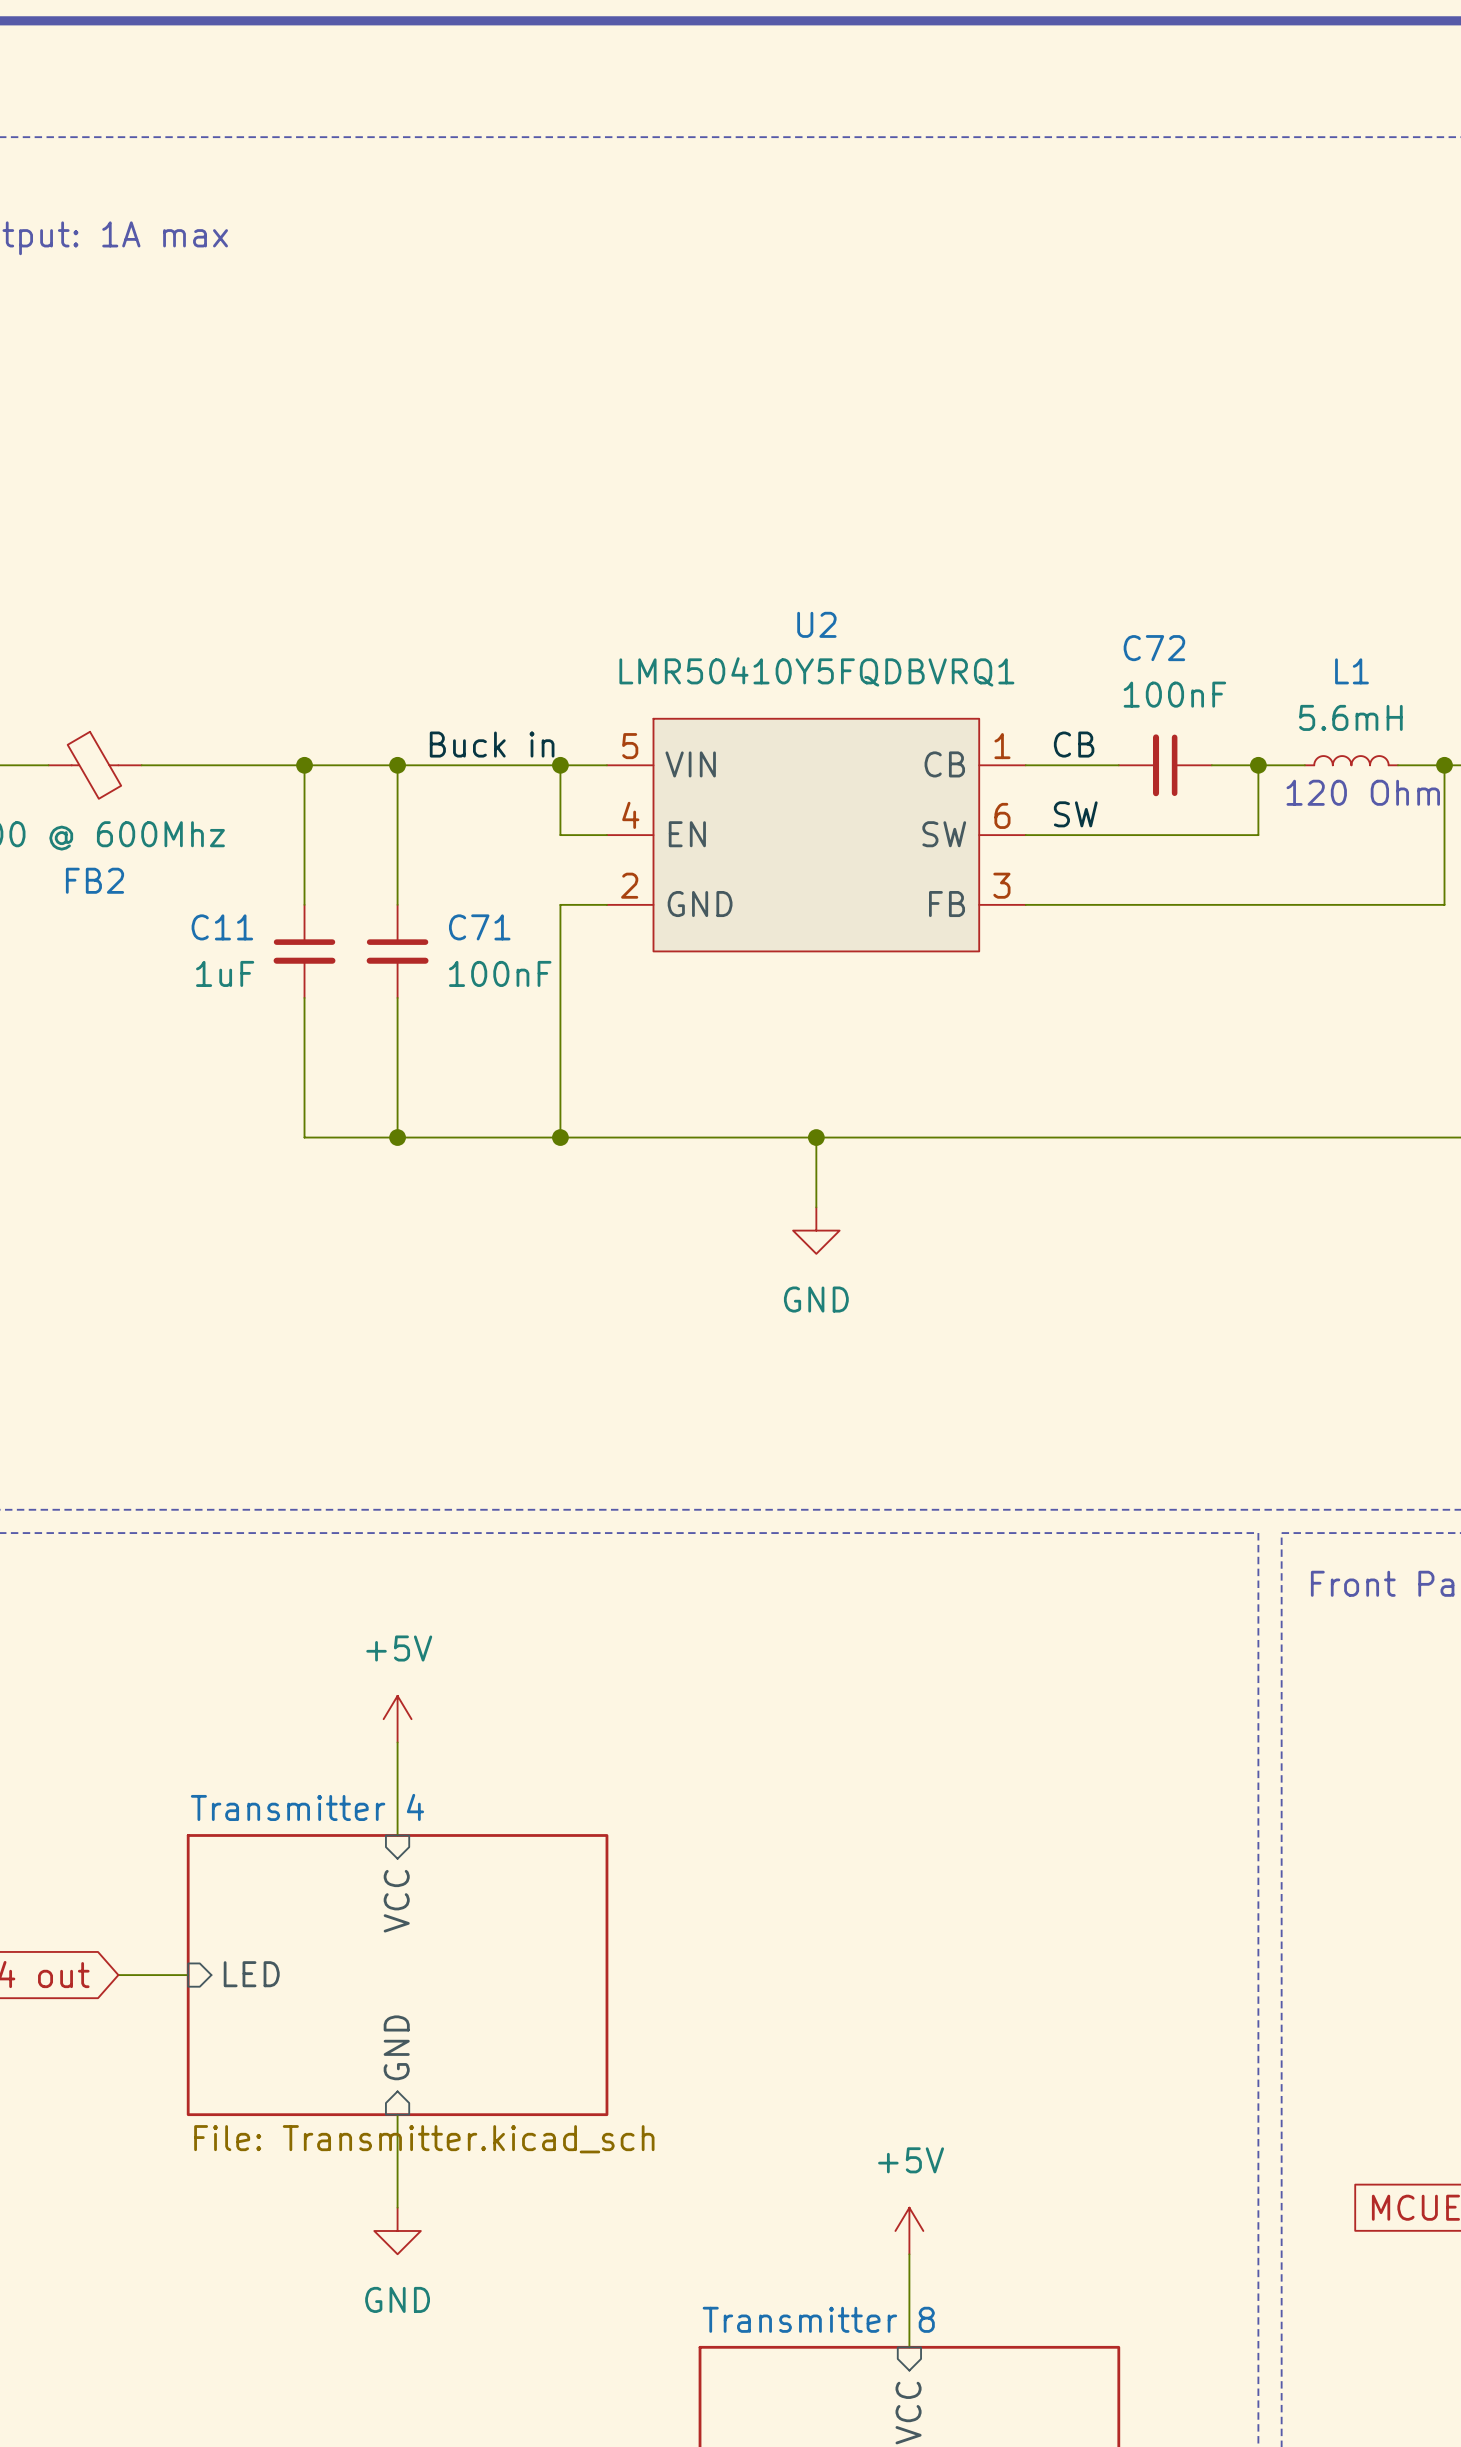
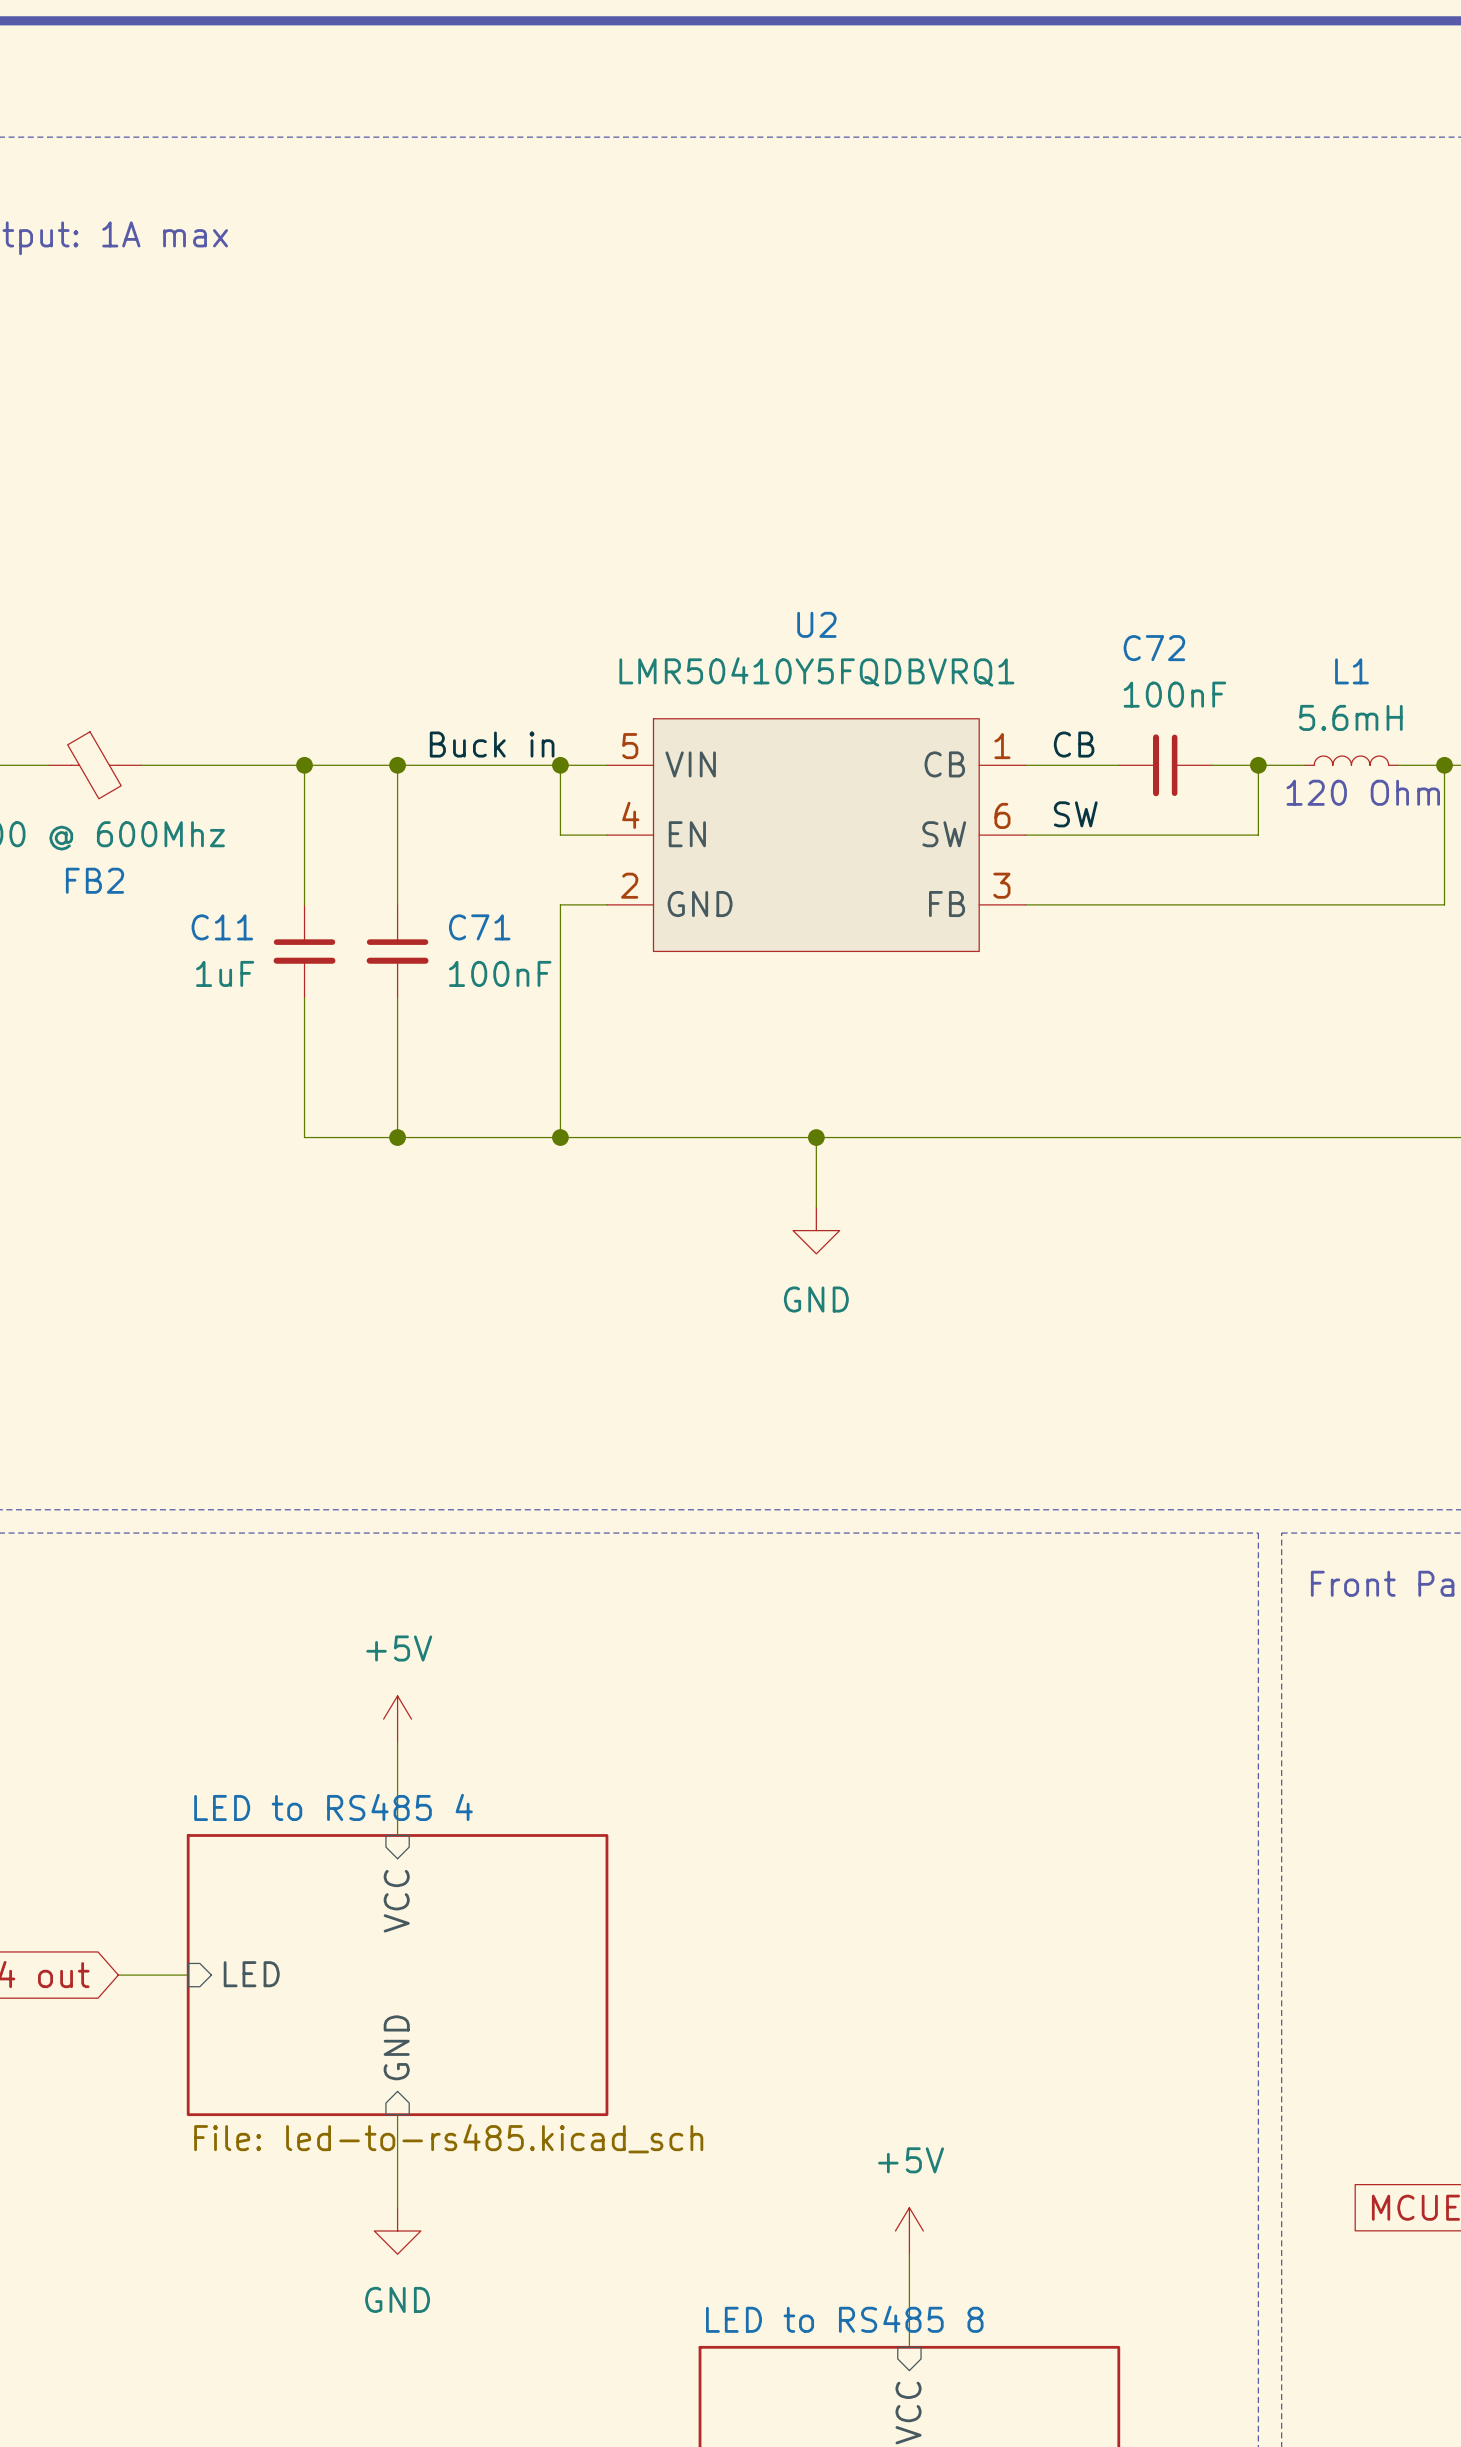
sheet Transmitter 4 name: Transmitter 4 (307, 1807) -> LED to RS485 4 (333, 1807)
sheet Transmitter 4 value: File: Transmitter.kicad_sch (424, 2139) -> File: led-to-rs485.kicad_sch (448, 2138)
sheet Transmitter 8 name: Transmitter 8 (818, 2319) -> LED to RS485 8 (844, 2319)

